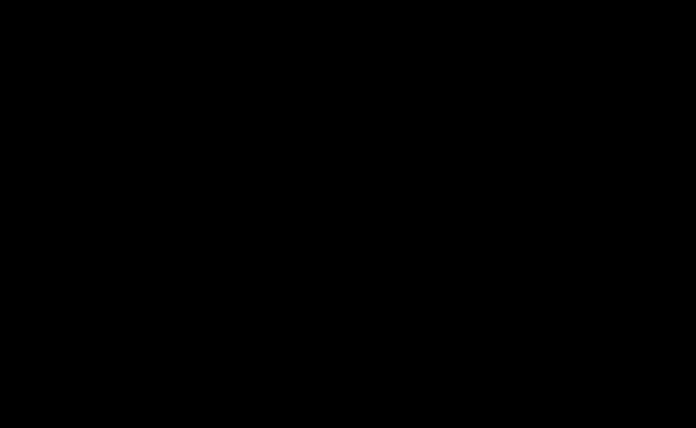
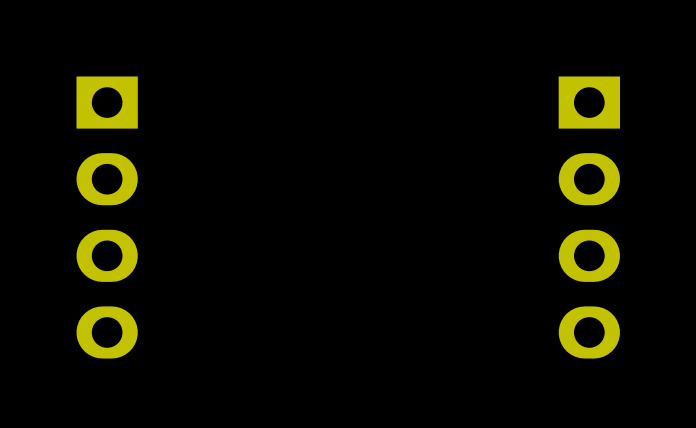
part: none -> (107, 217)
part: none -> (589, 217)

